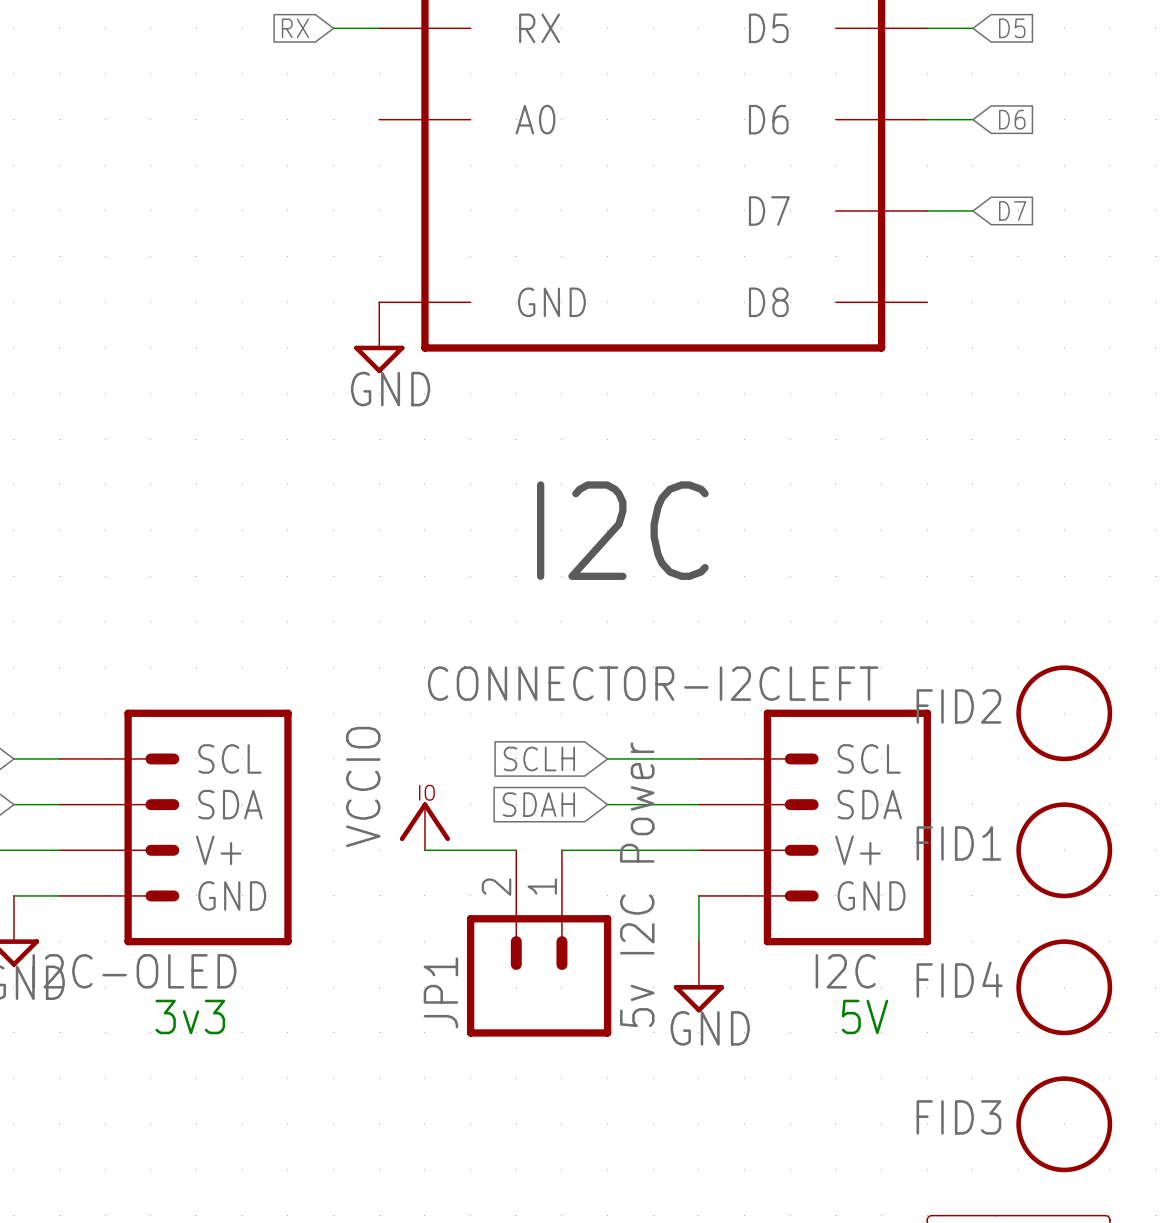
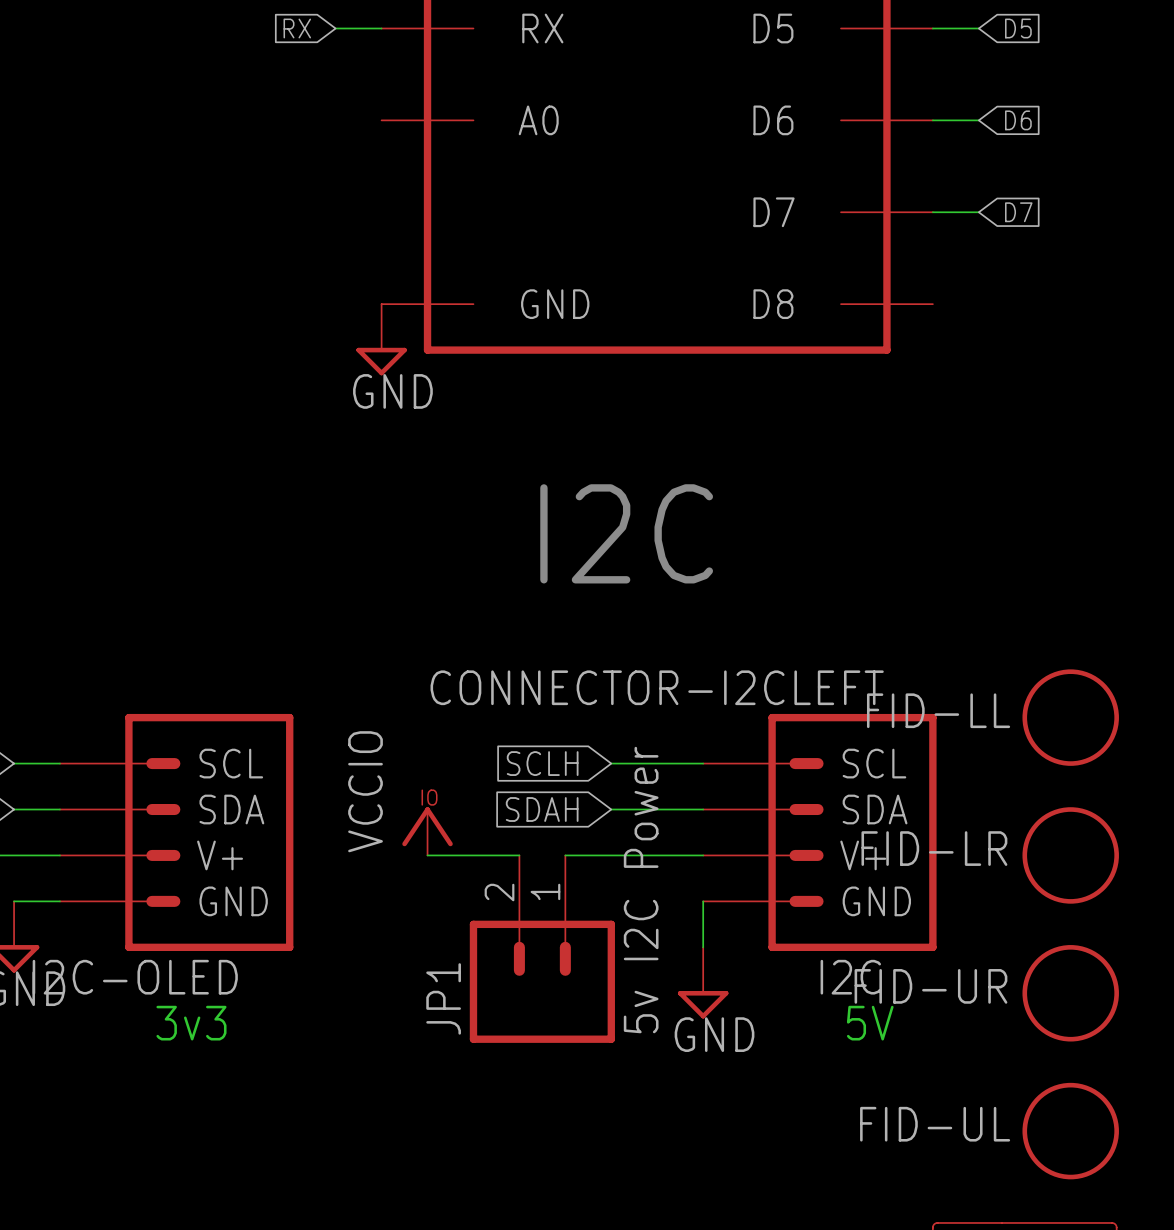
FID2 name: FID2 (958, 706) -> FID-LL (938, 710)
FID1 name: FID1 (958, 843) -> FID-LR (934, 848)
FID4 name: FID4 (959, 979) -> FID-UR (930, 986)
FID3 name: FID3 (958, 1117) -> FID-UL (935, 1124)

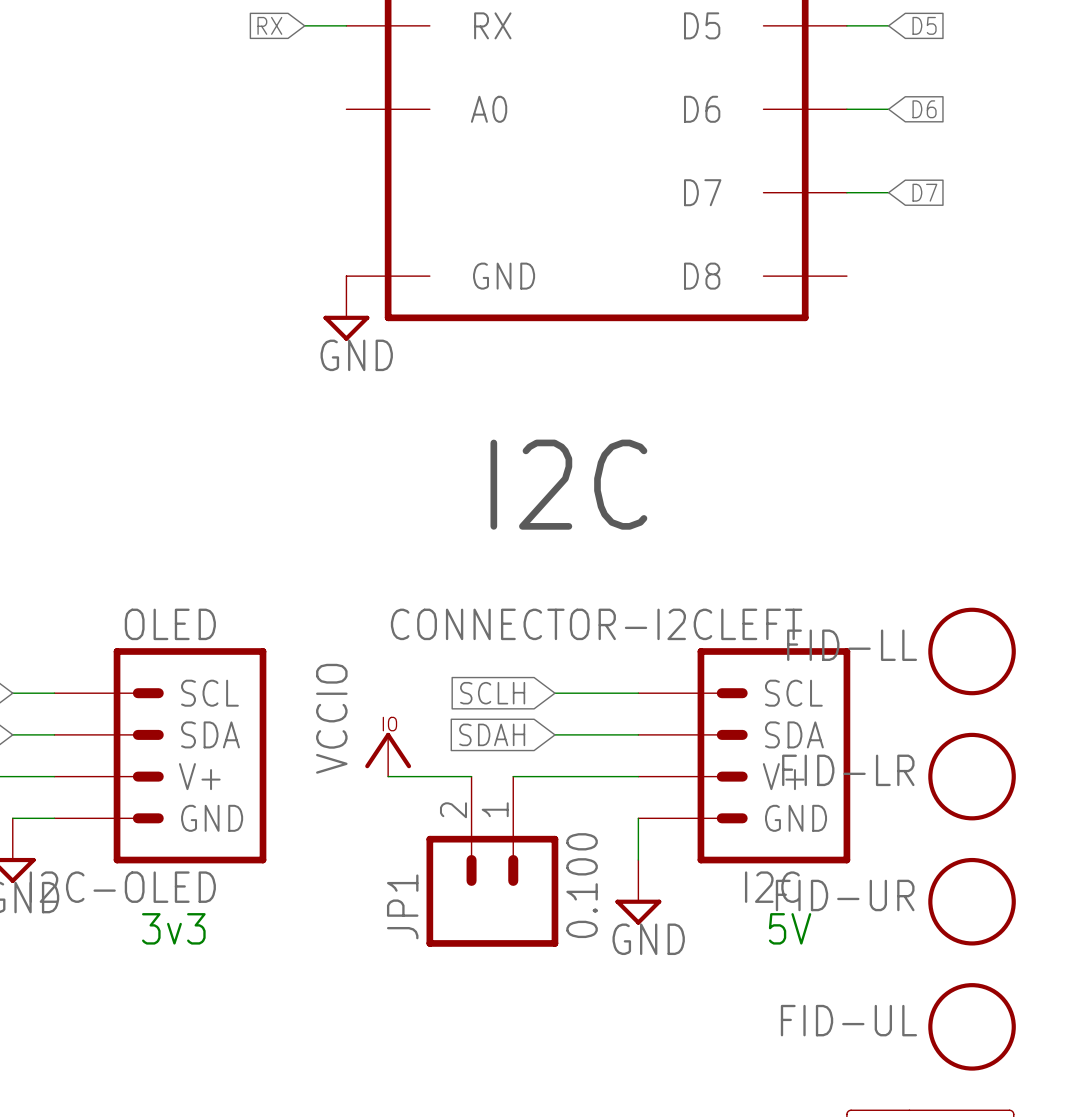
I2C-OLED value: none -> OLED (170, 624)
JP1 value: 5v I2C Power (641, 890) -> 0.100 (582, 885)

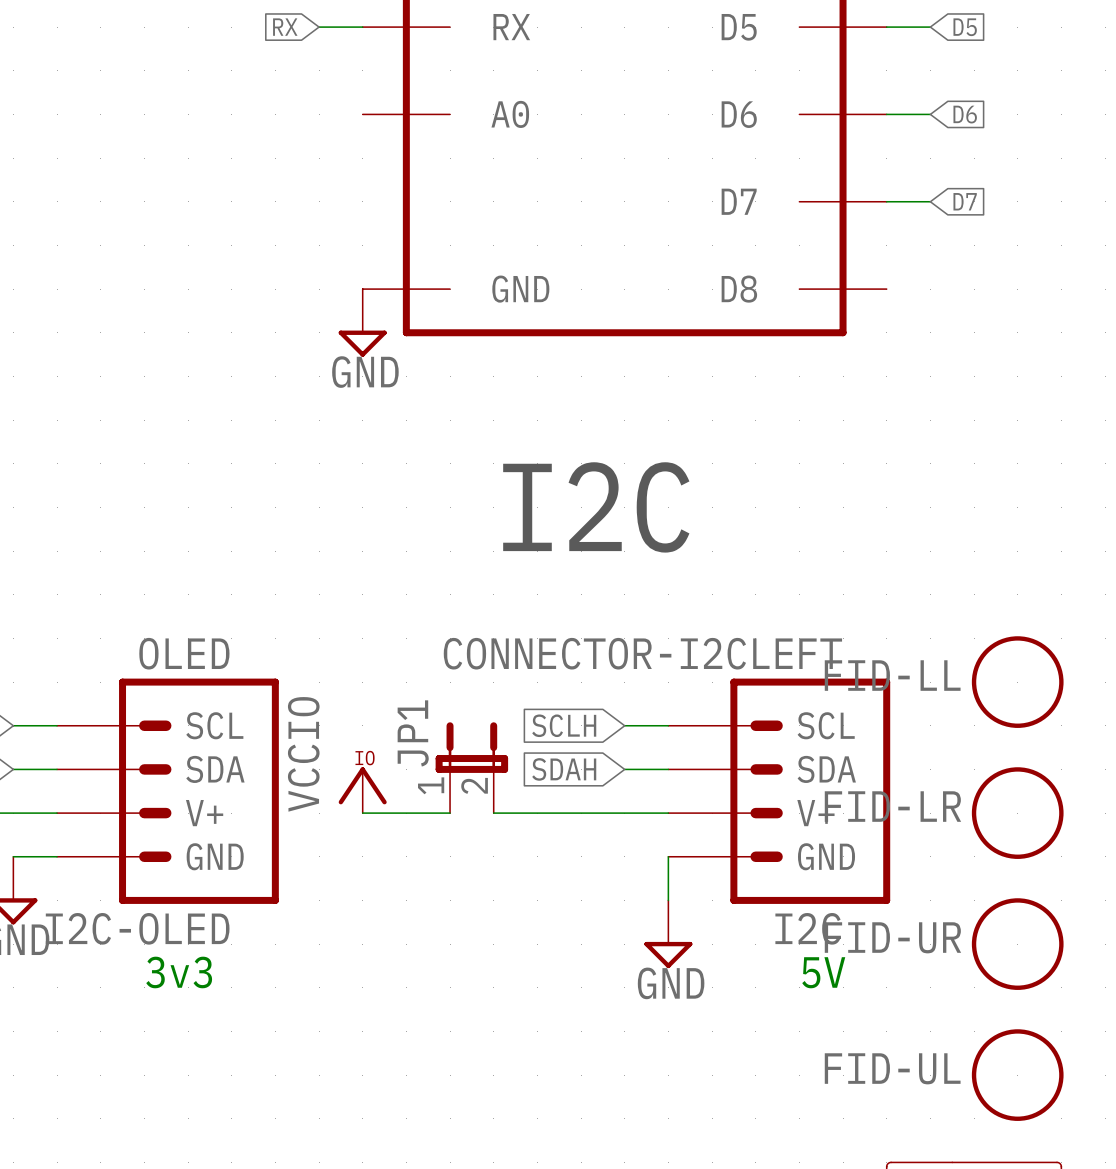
global label position: SCLH (492, 693) -> SCLH (564, 725)
wire: (554, 693) (596, 693) -> none
global label position: SDAH (492, 734) -> SDAH (564, 769)
wire: (554, 734) (596, 734) -> (362, 813) (406, 813)
power symbol position: VCCIO (388, 754) -> VCCIO (362, 790)
JP1 symbol: [426, 776, 559, 947] -> [435, 722, 509, 814]
wire: (429, 776) (471, 776) -> (537, 813) (493, 813)
JP1 value: 0.100 (582, 885) -> none
JP1 name position: JP1 (402, 906) -> JP1 (413, 733)

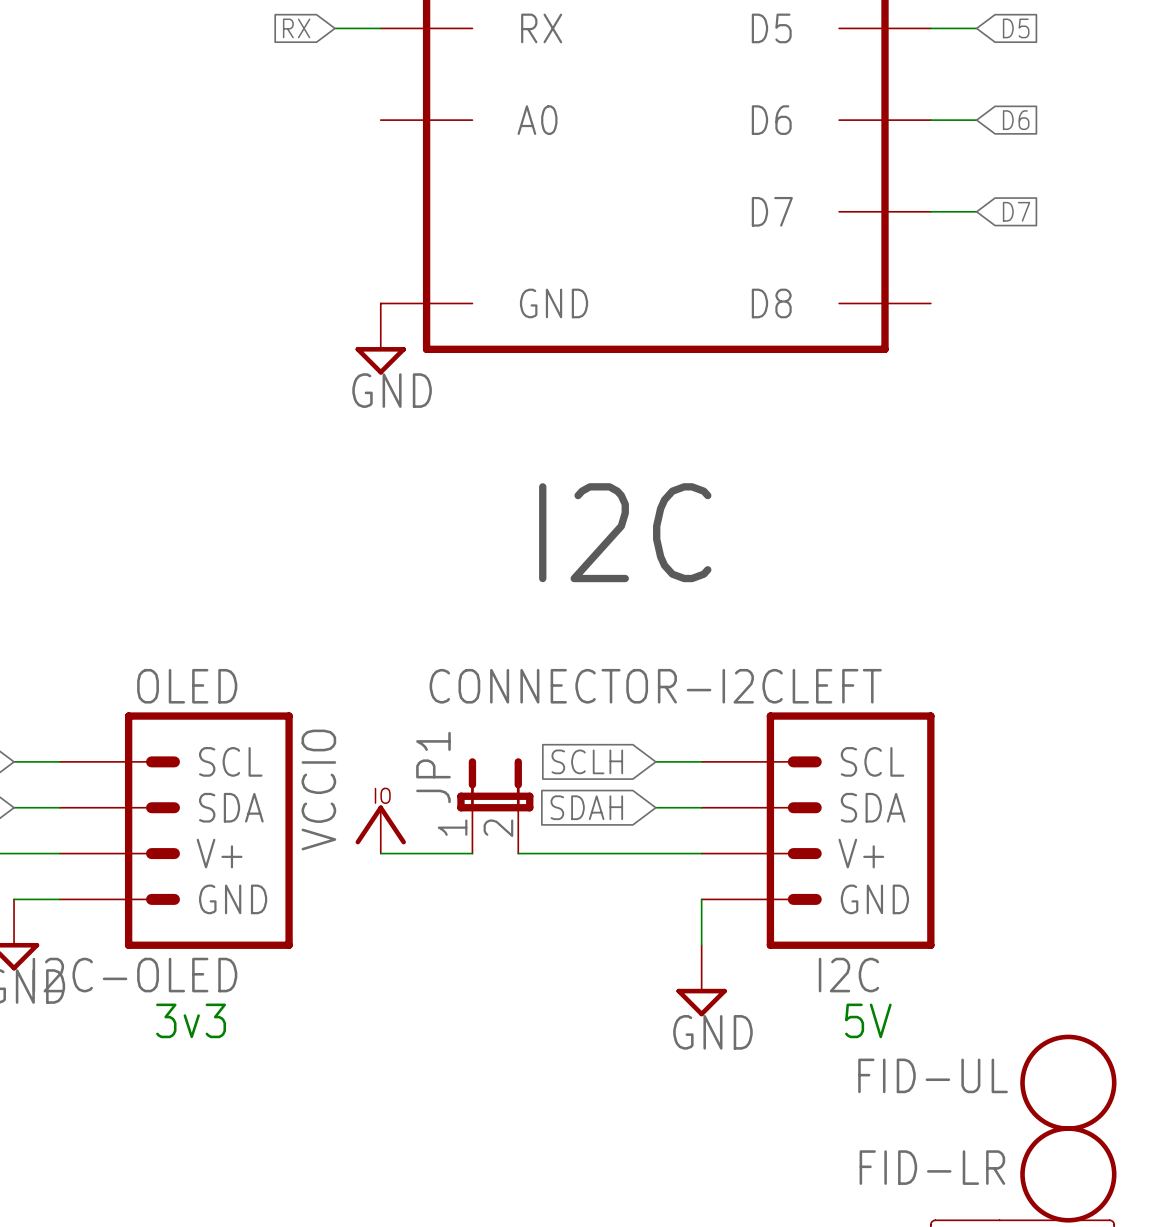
FID-LL: (1017, 682) -> none
FID-LR position: (1017, 813) -> (1068, 1174)
FID-UR: (1017, 944) -> none
FID-UL position: (1017, 1075) -> (1068, 1082)

